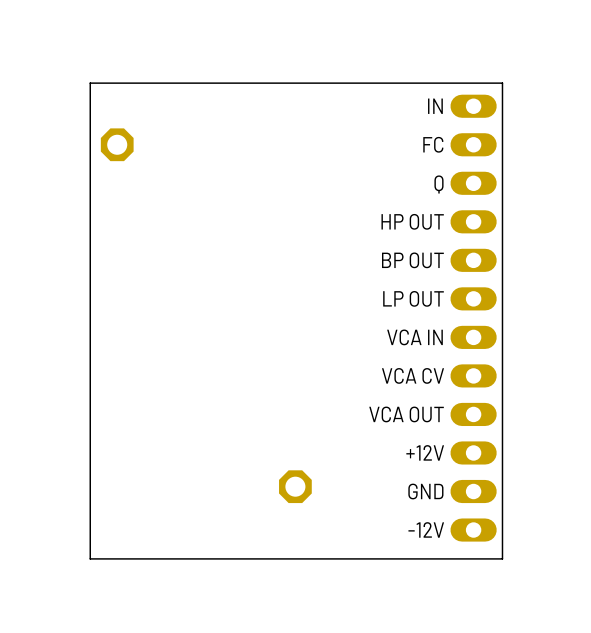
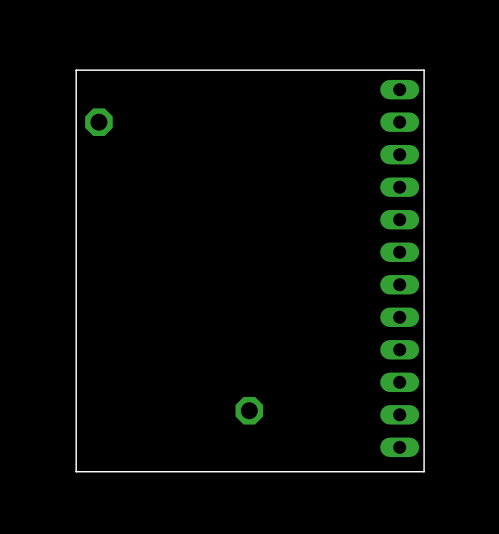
text: IN (435, 106) -> none
text: FC (433, 144) -> none
text: Q (438, 184) -> none
text: HP OUT (412, 221) -> none
text: BP OUT (412, 260) -> none
text: LP OUT (413, 298) -> none
text: VCA IN (415, 337) -> none
text: VCA CV (413, 375) -> none
text: VCA OUT (406, 414) -> none
text: +12V (425, 452) -> none
text: GND (425, 491) -> none
text: -12V (426, 529) -> none

